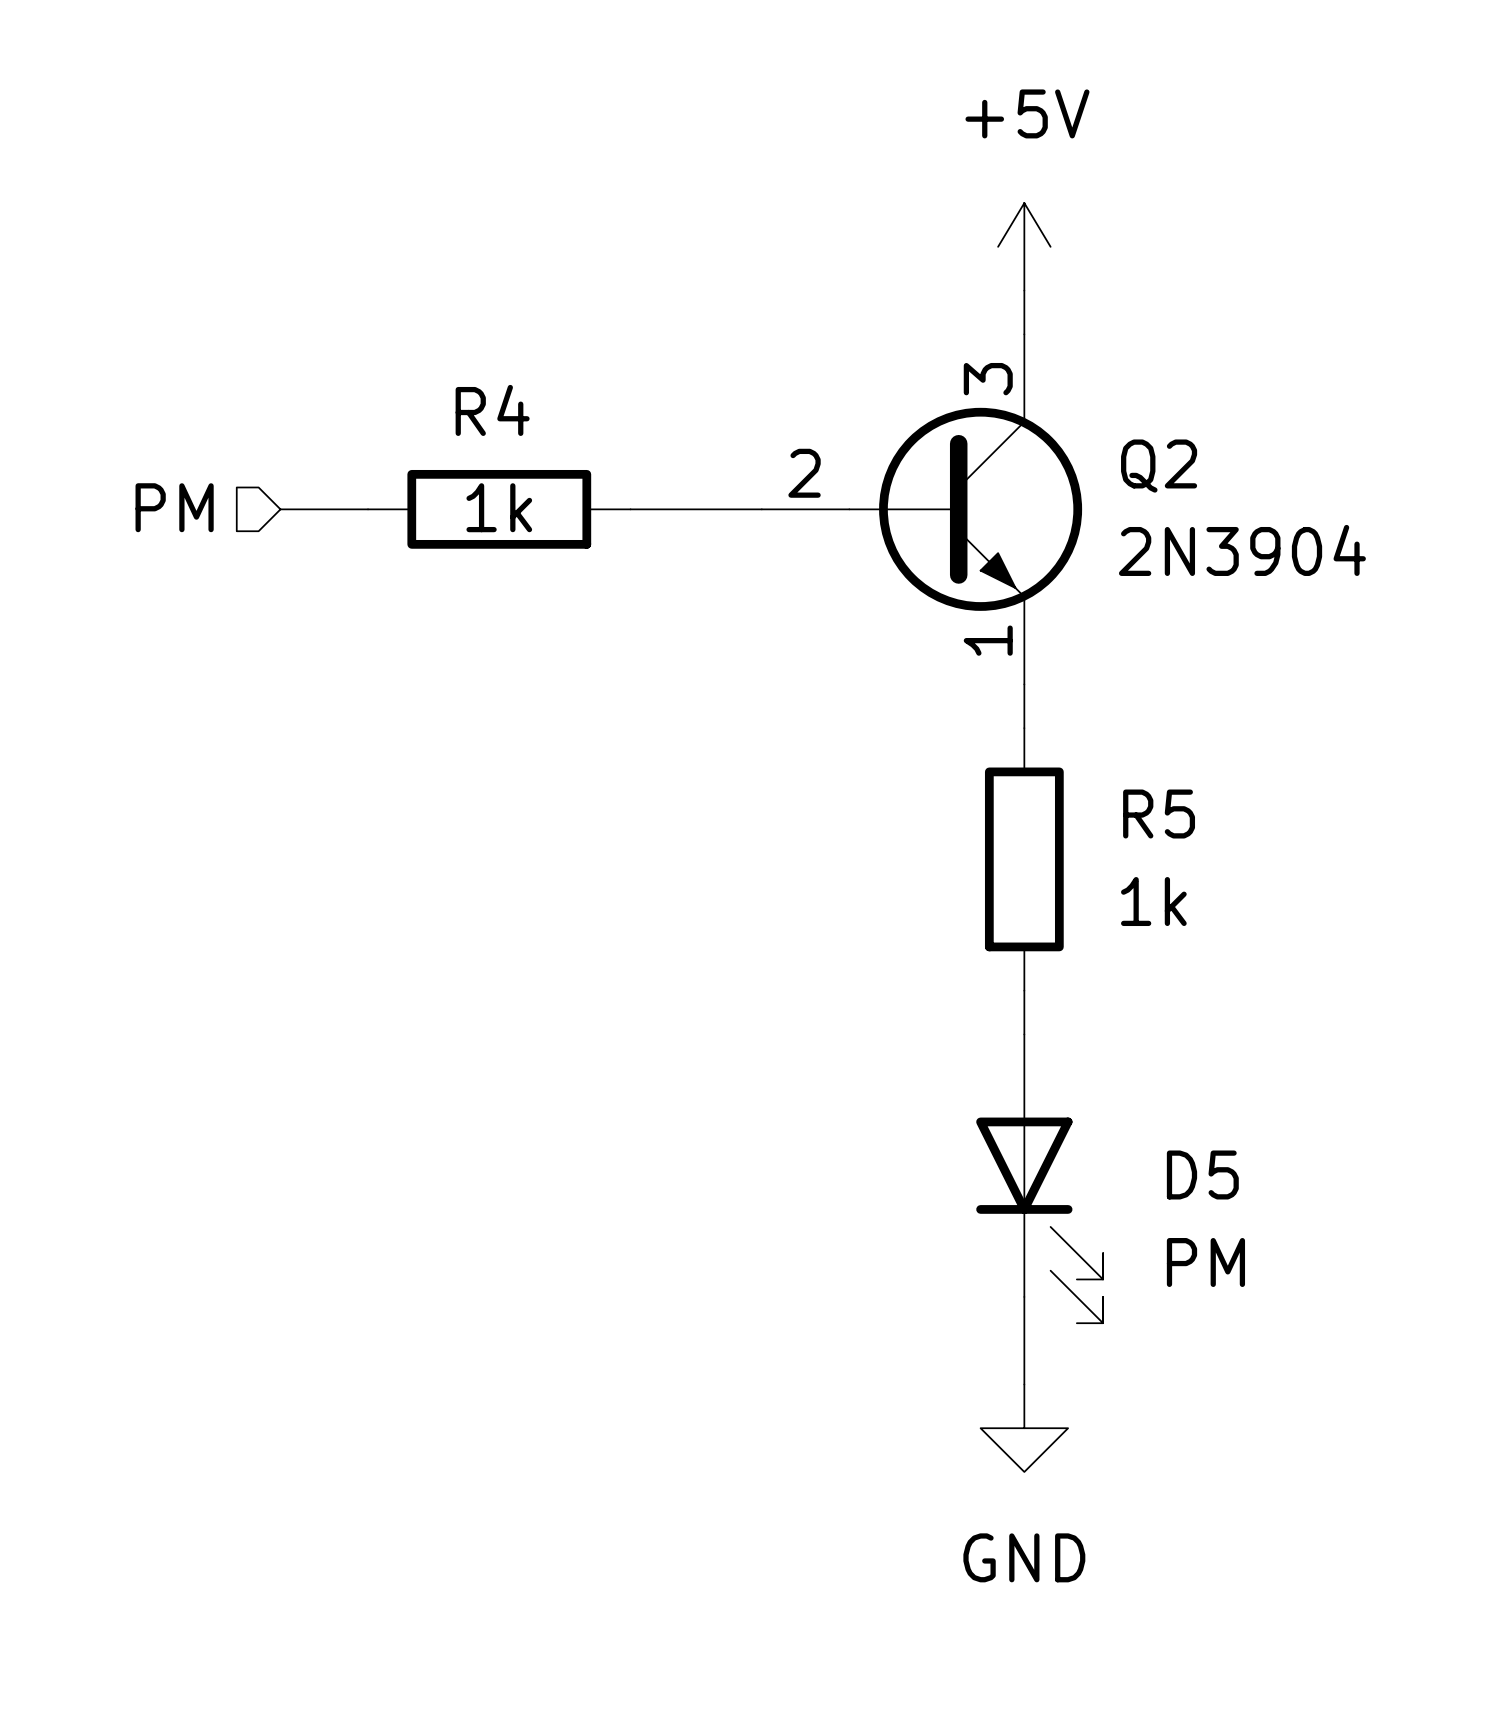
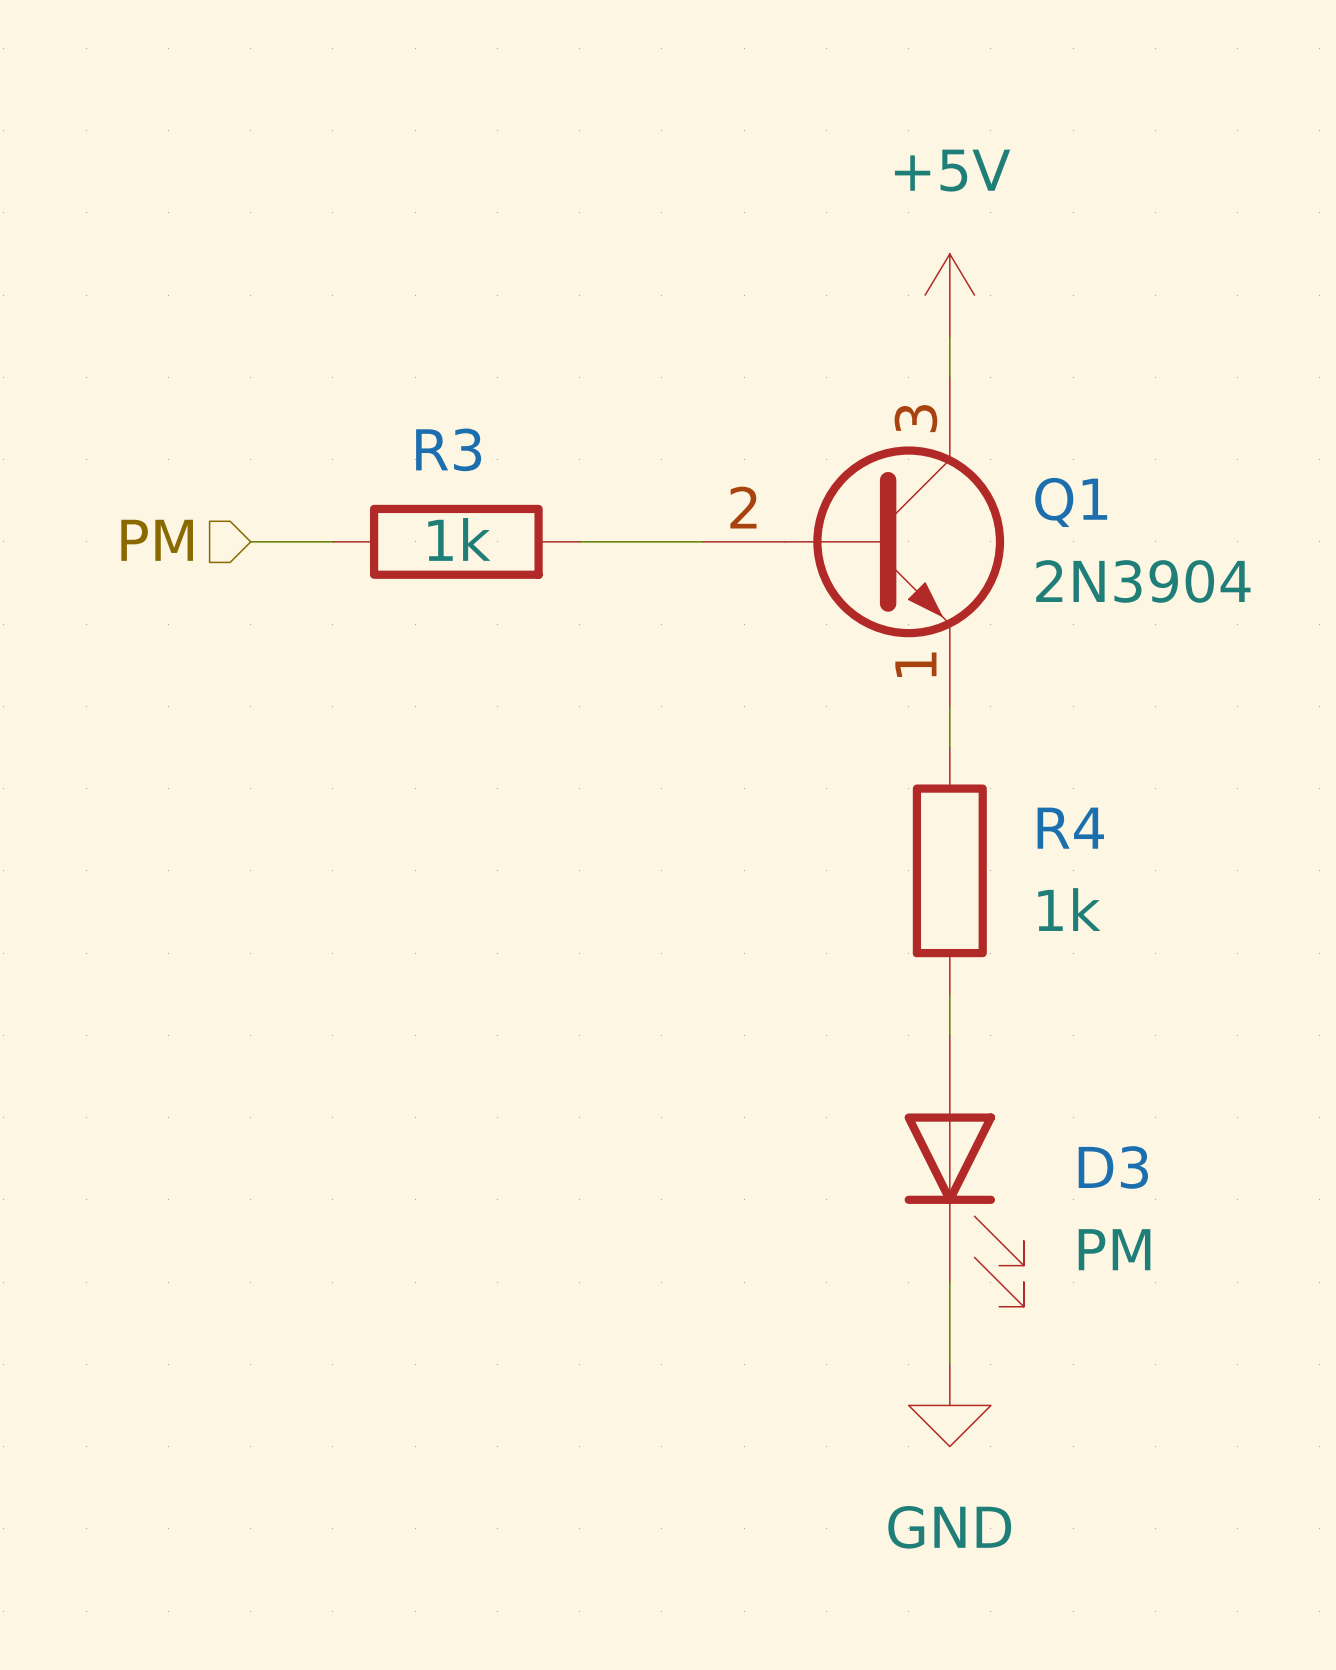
R4 name: R4 (492, 410) -> R3 (448, 449)
Q2 name: Q2 (1159, 466) -> Q1 (1071, 502)
R5 name: R5 (1159, 814) -> R4 (1070, 828)
D5 name: D5 (1202, 1174) -> D3 (1113, 1167)

